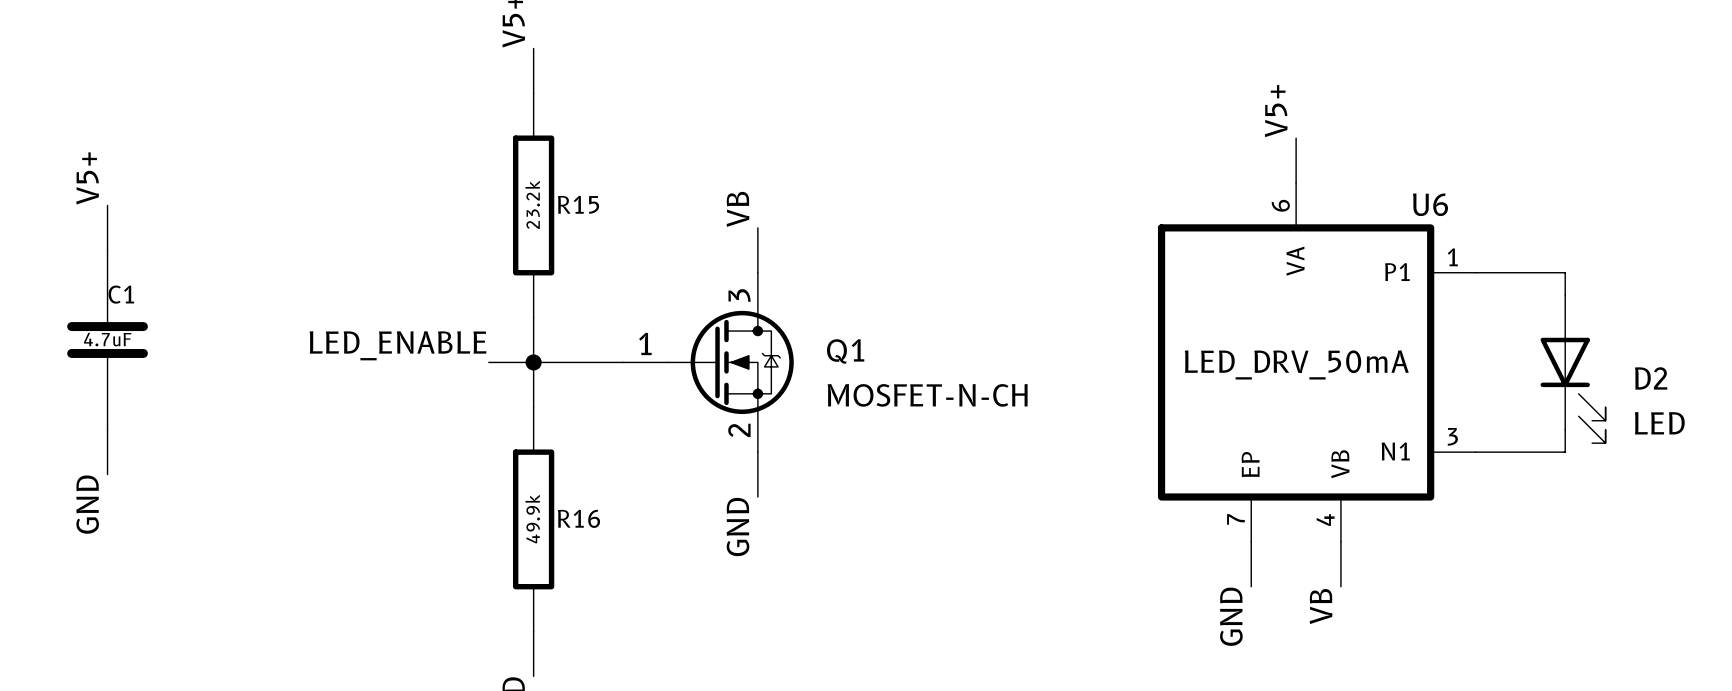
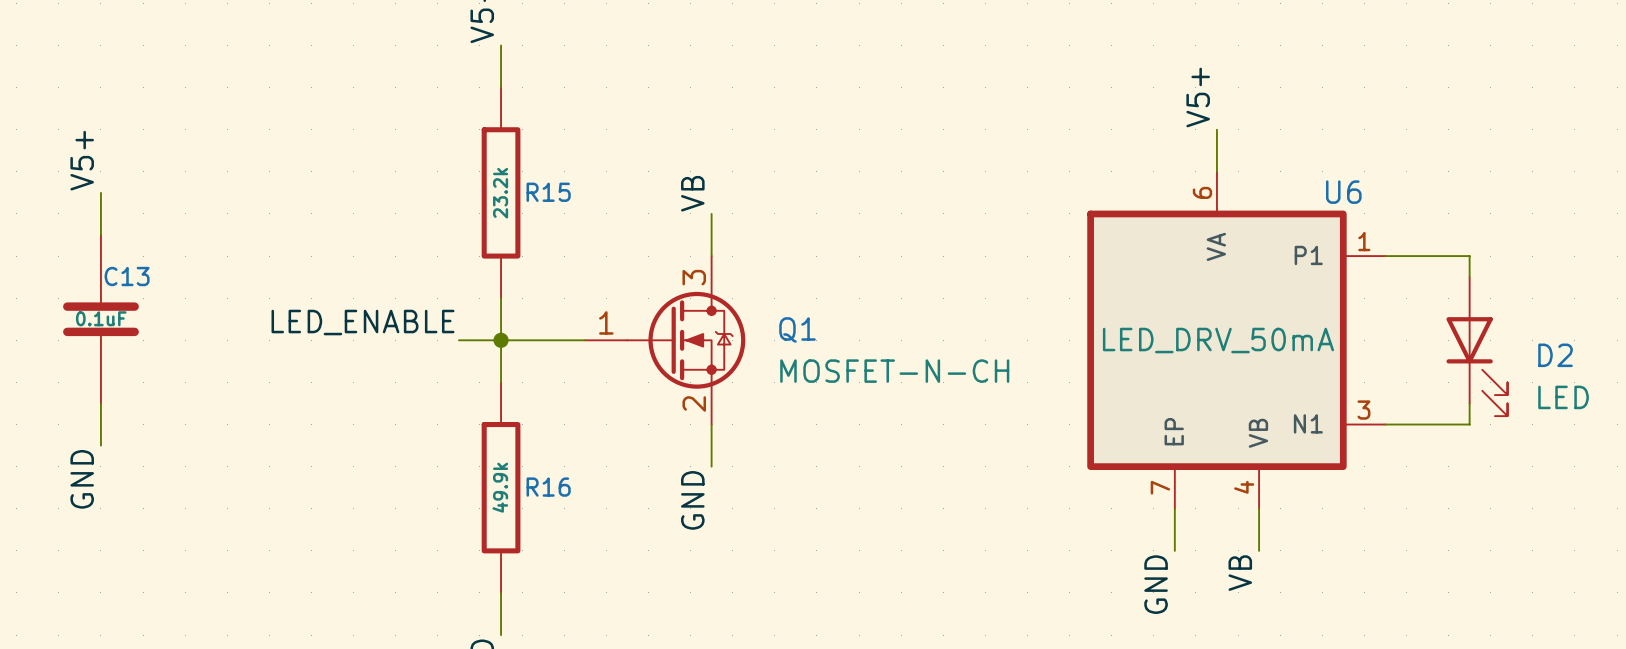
C1 name: C1 (121, 294) -> C13 (127, 276)
C1 value: 4.7uF (107, 339) -> 0.1uF (101, 318)

